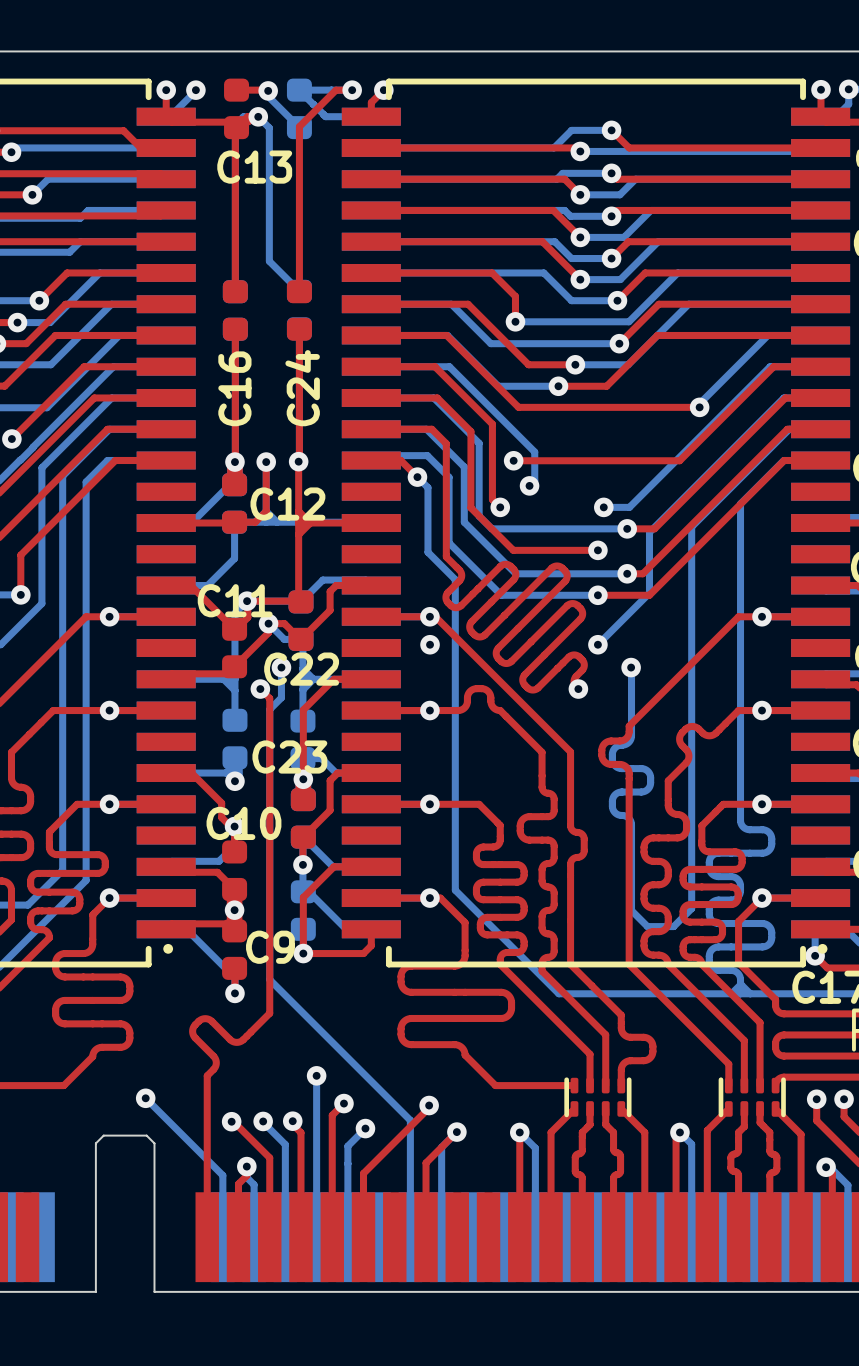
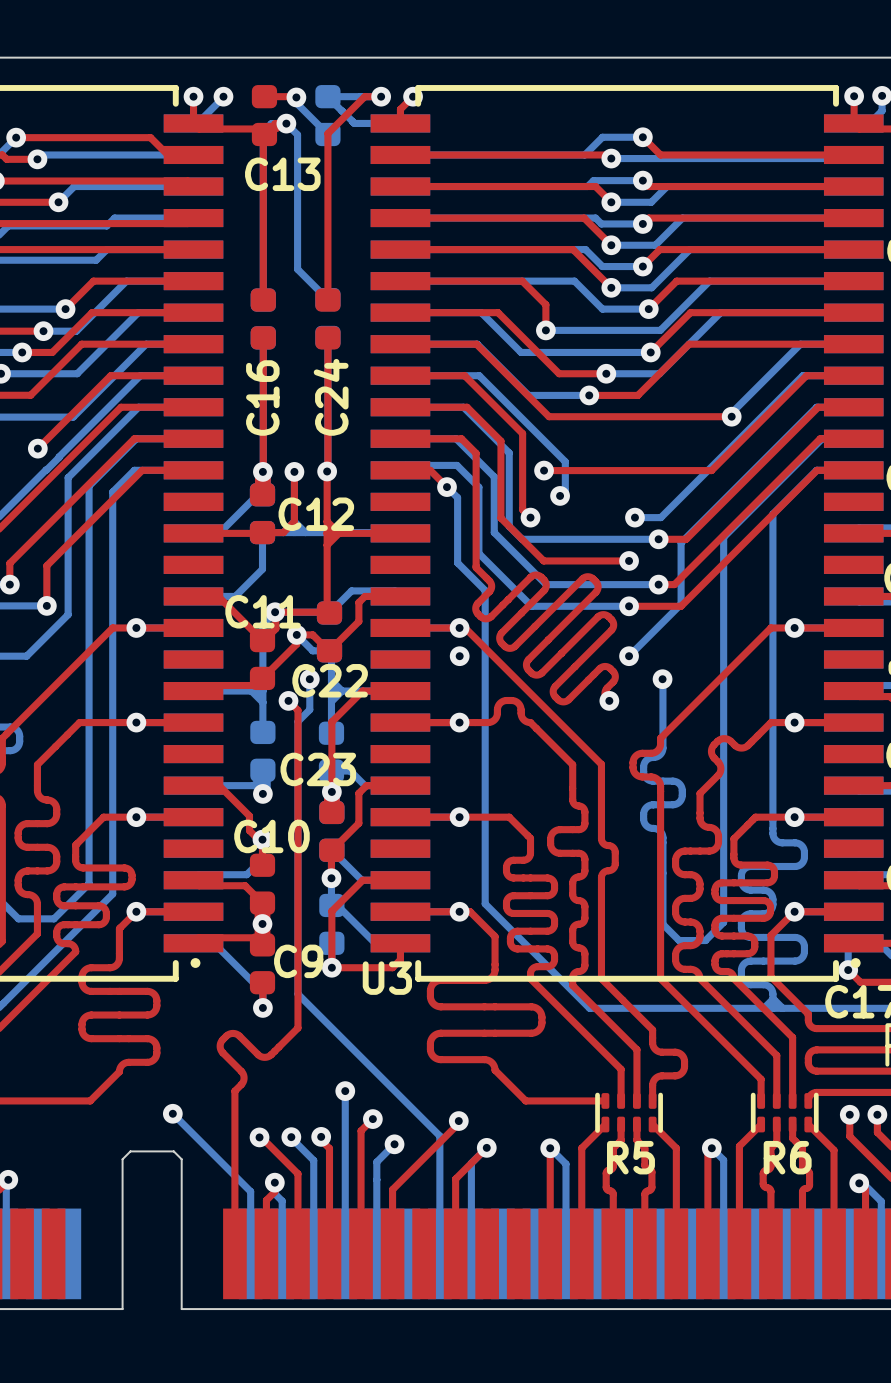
U3 name: none -> U3 (387, 978)
R5 name: none -> R5 (630, 1157)
R6 name: none -> R6 (787, 1157)

